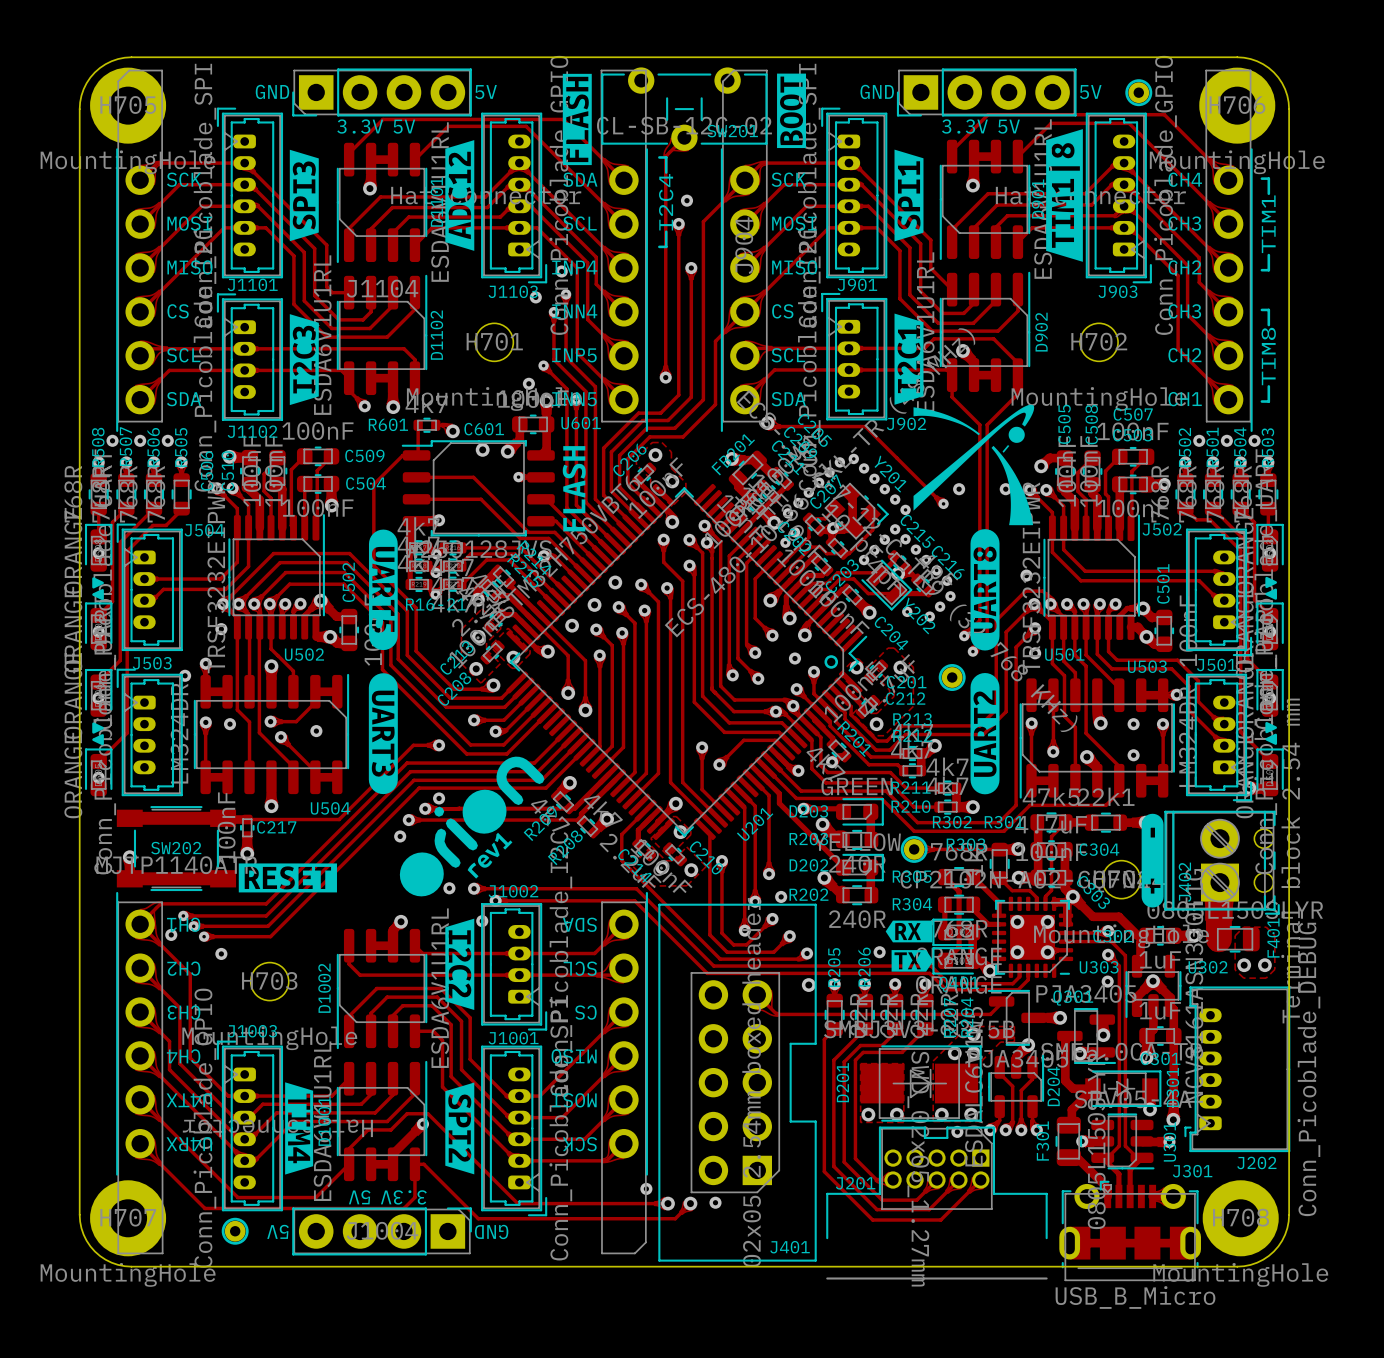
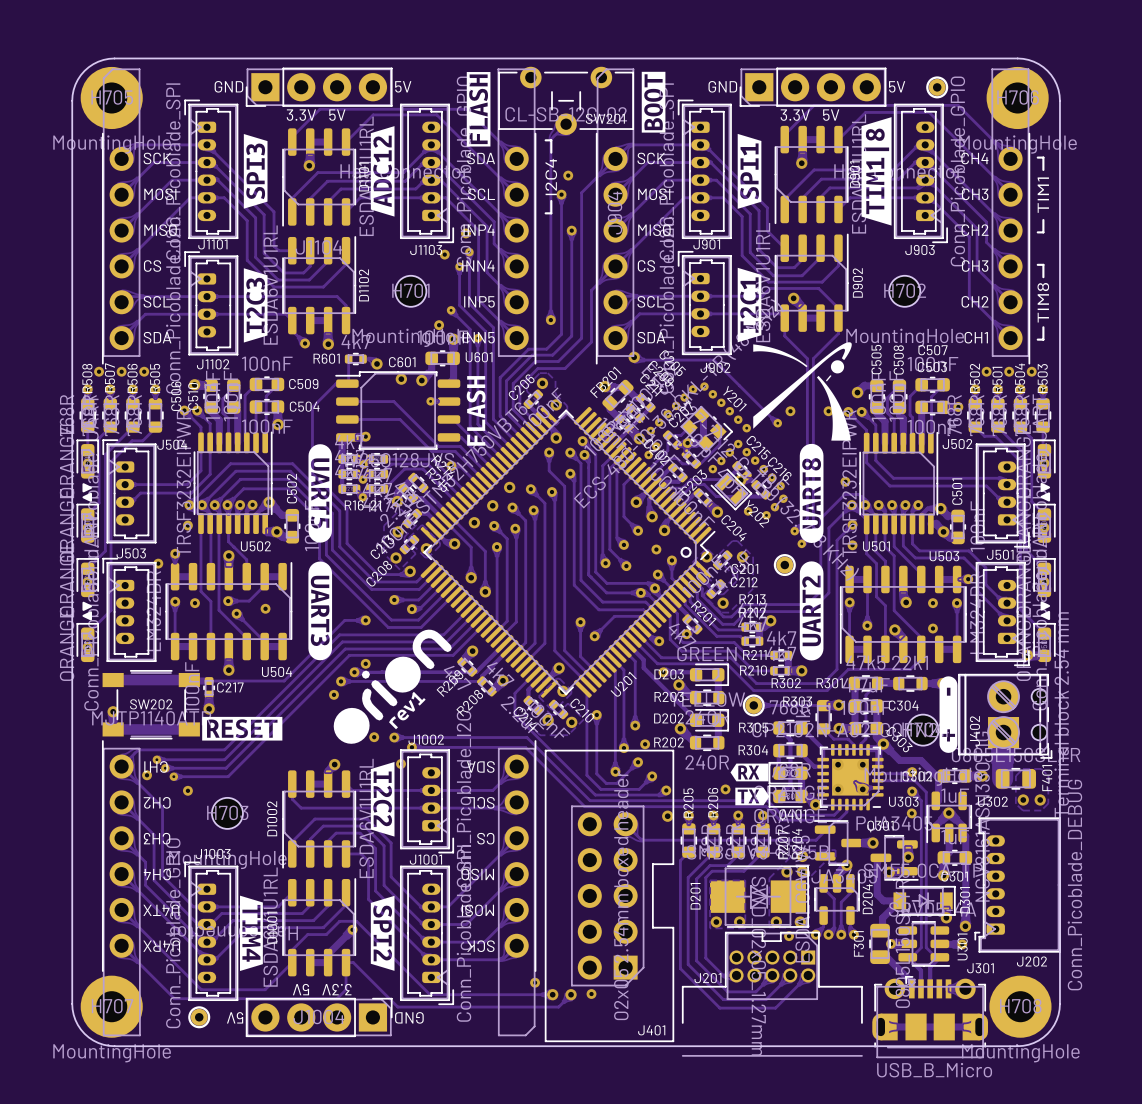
J902 name position: J902 (906, 423) -> J902 (715, 367)

